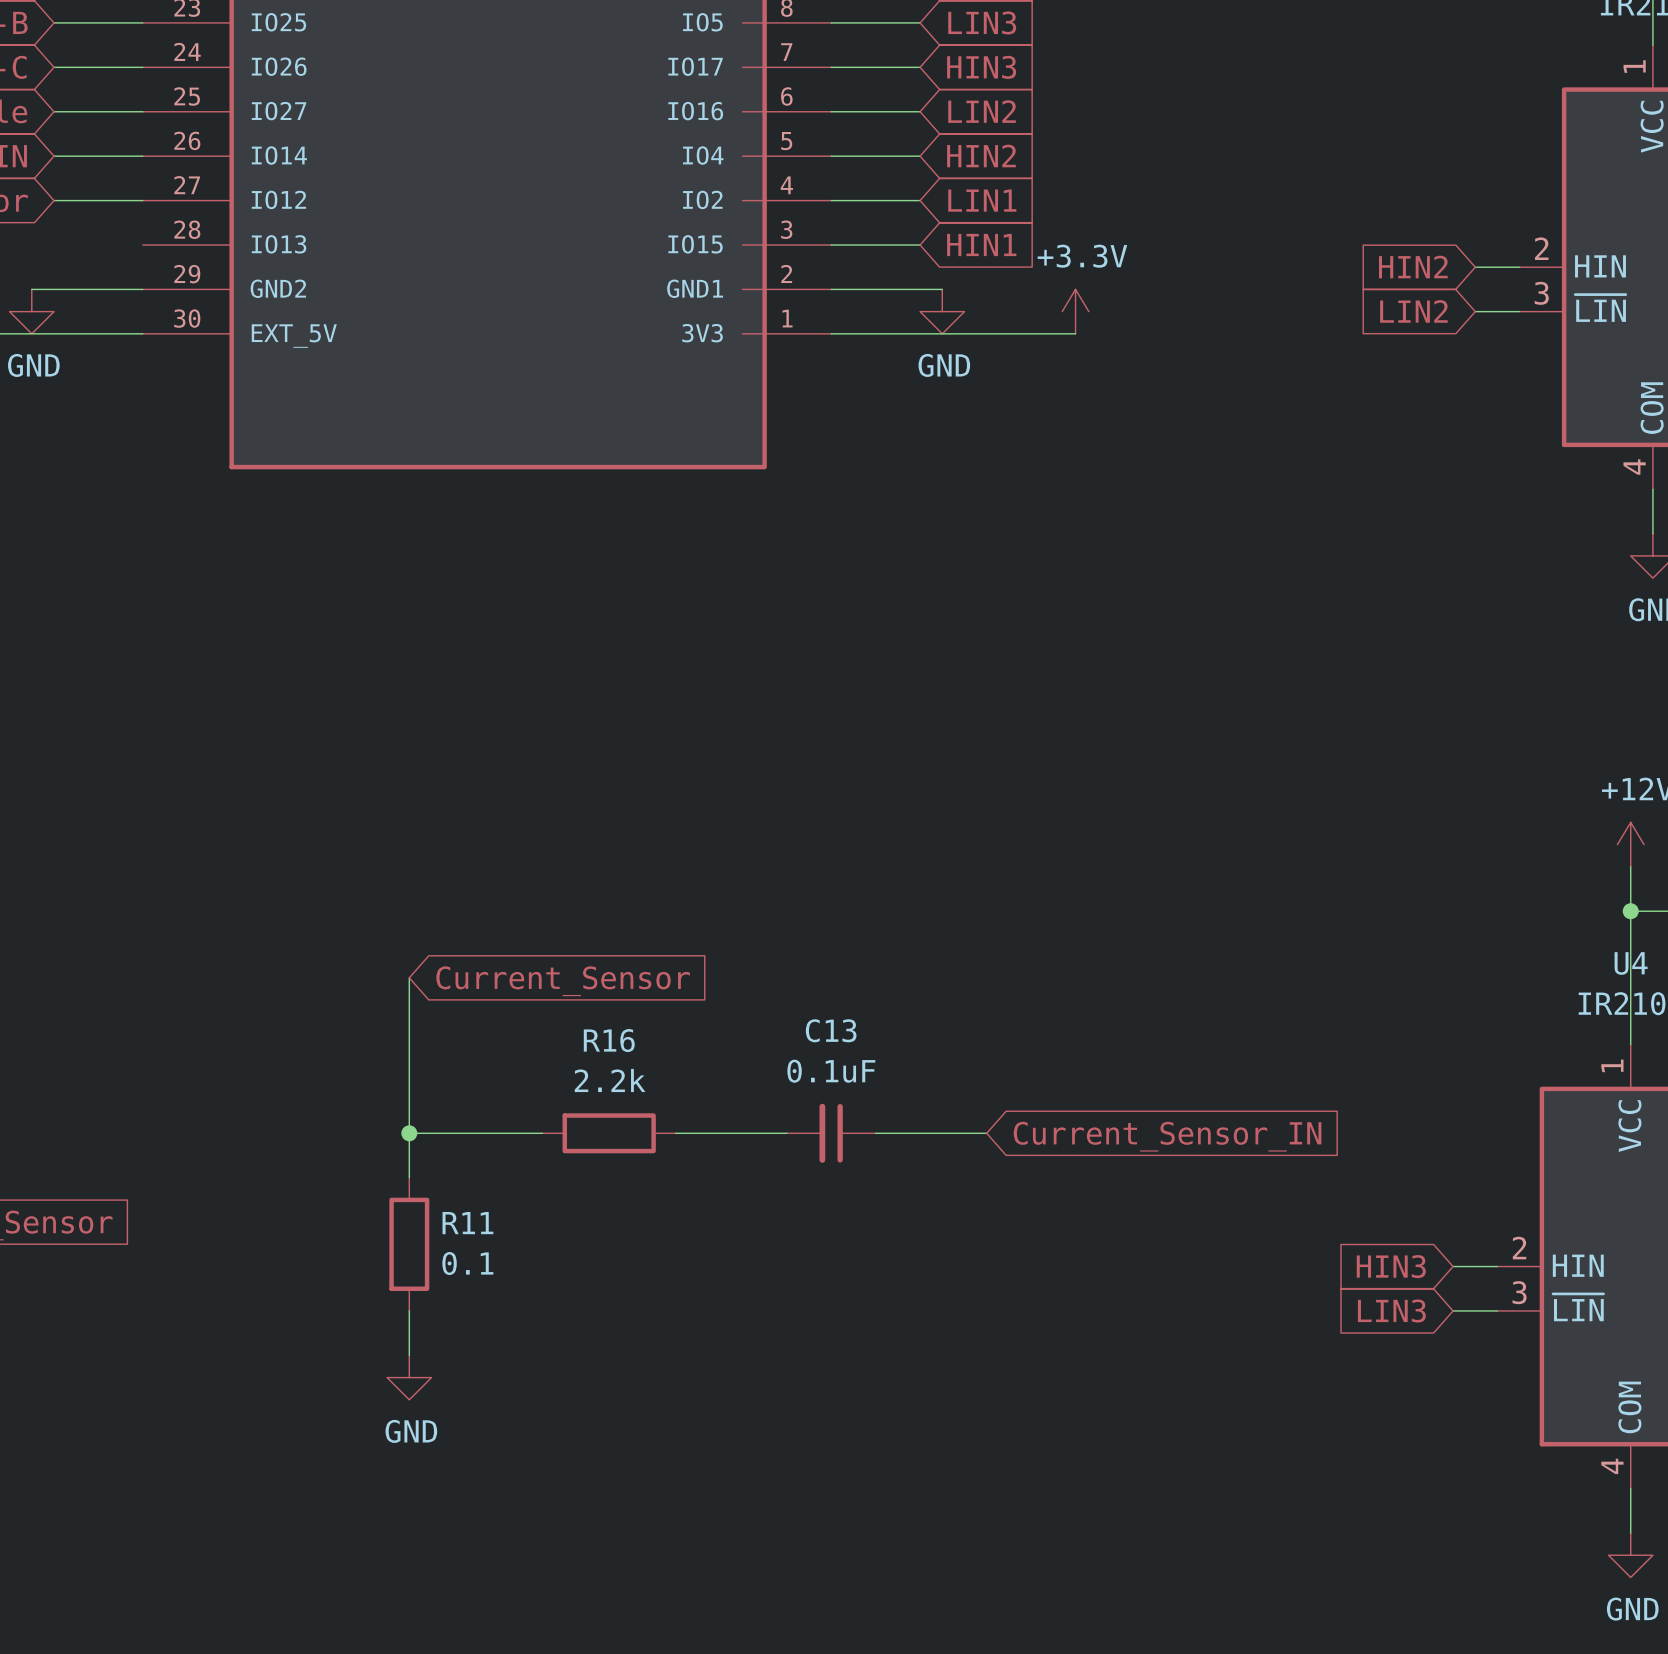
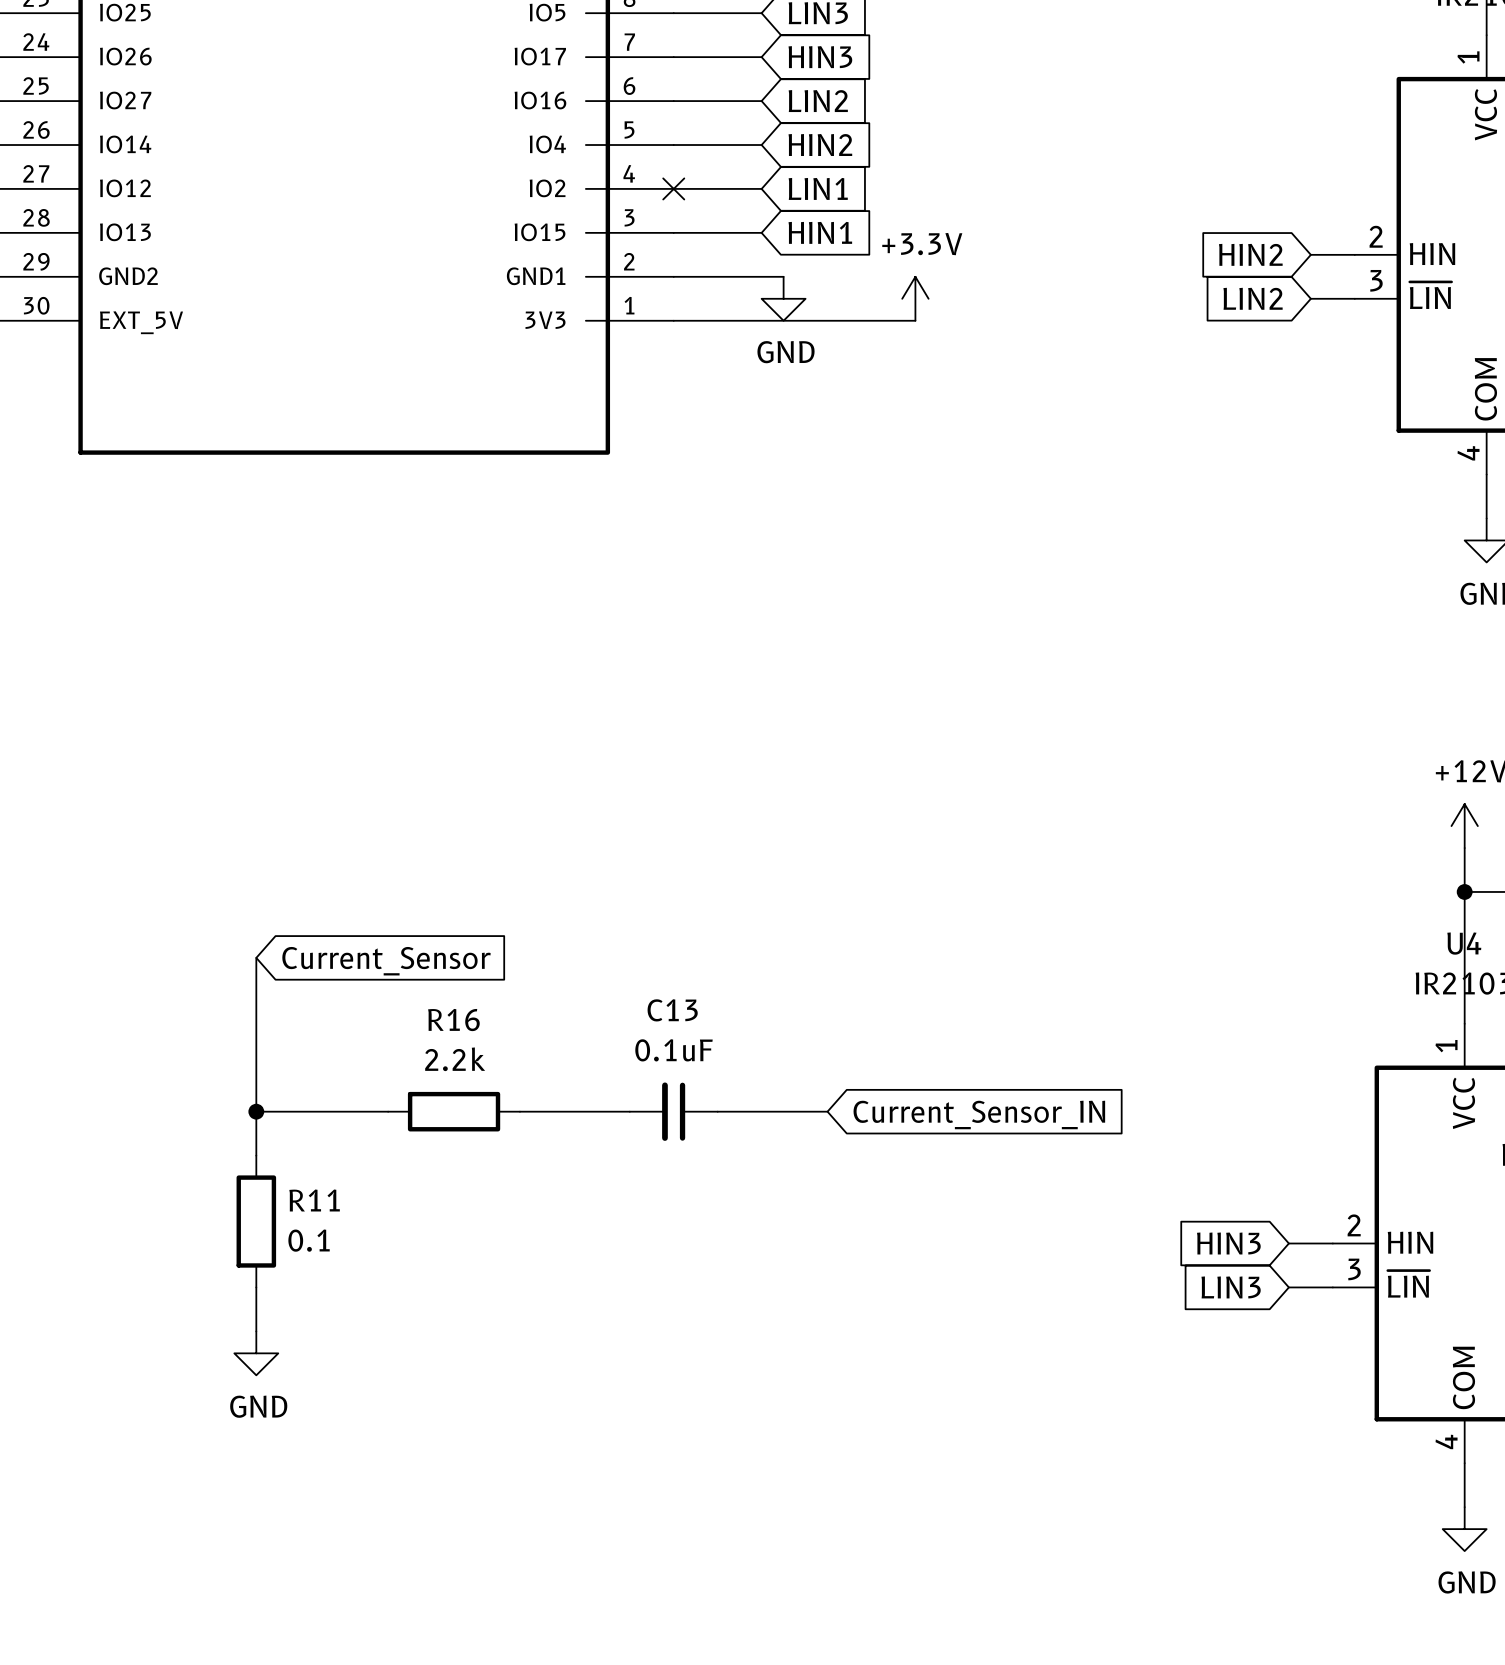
no-connect mark: none -> (673, 188)

